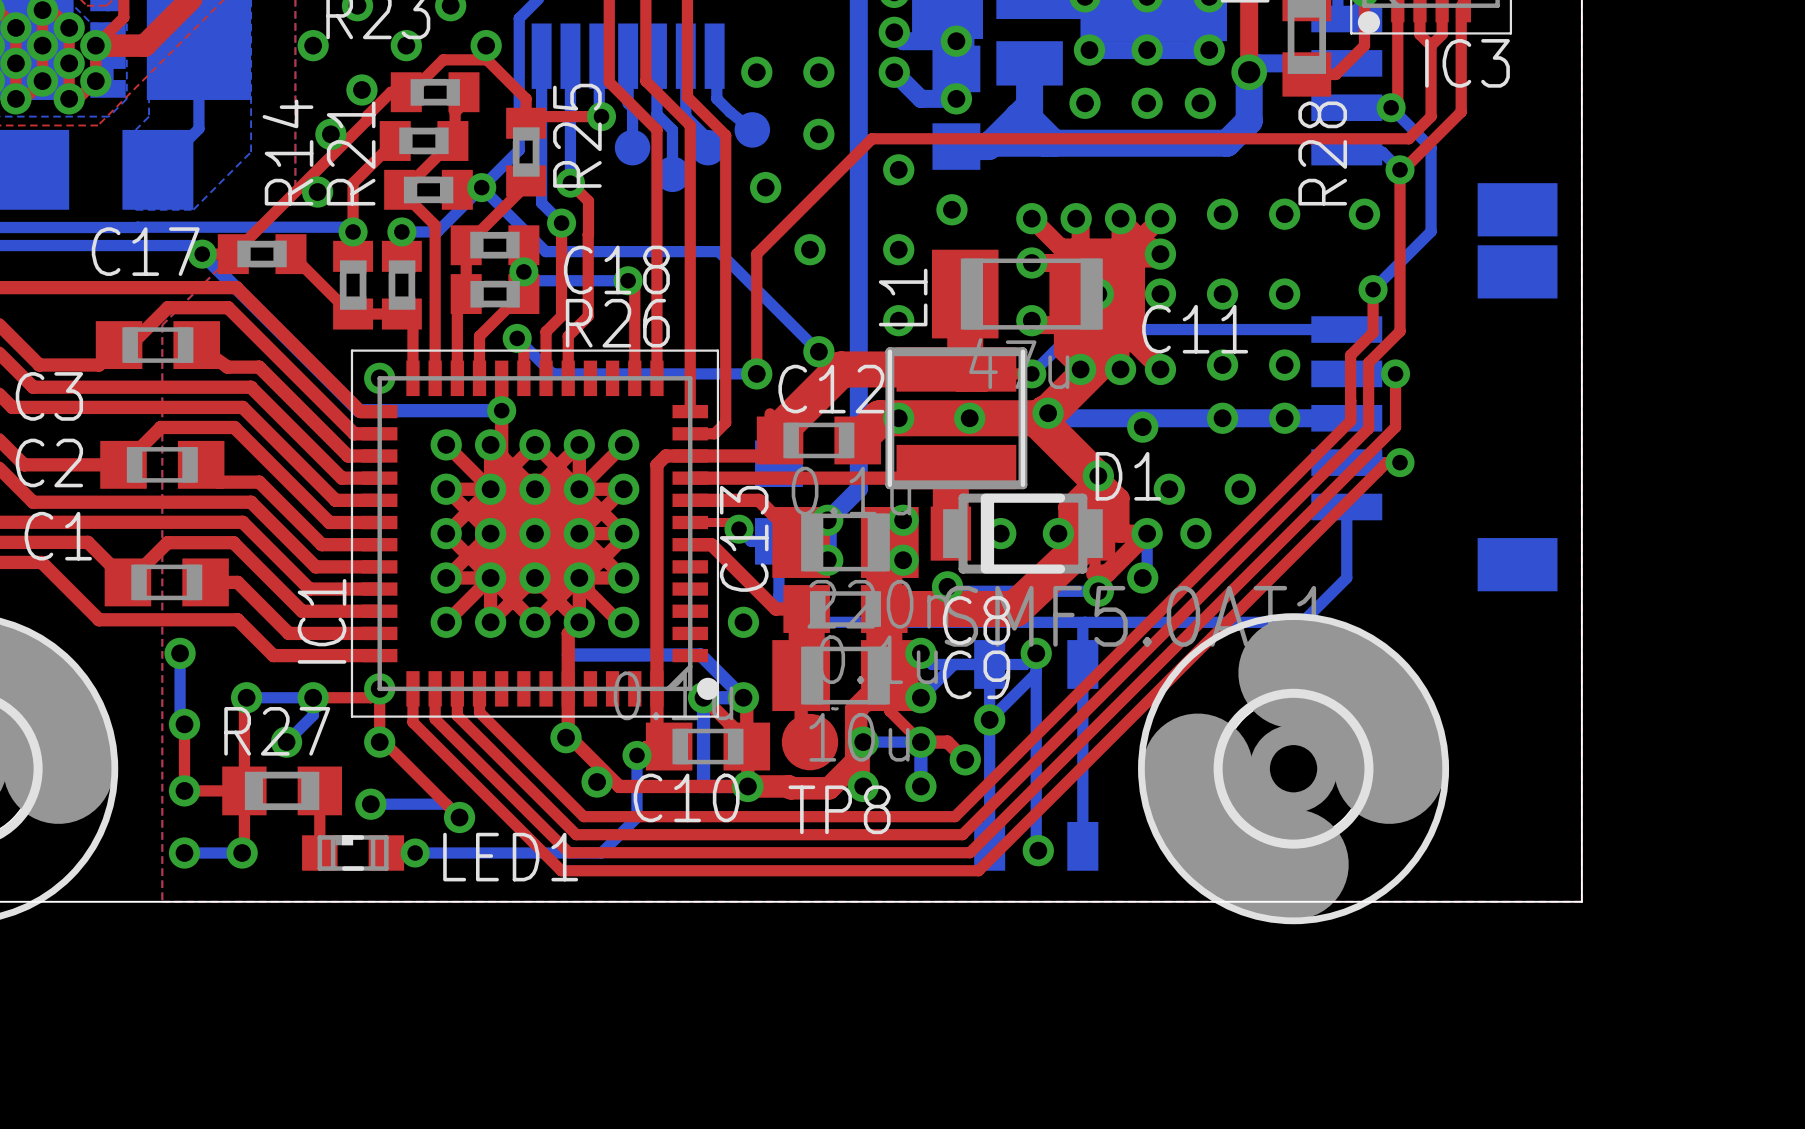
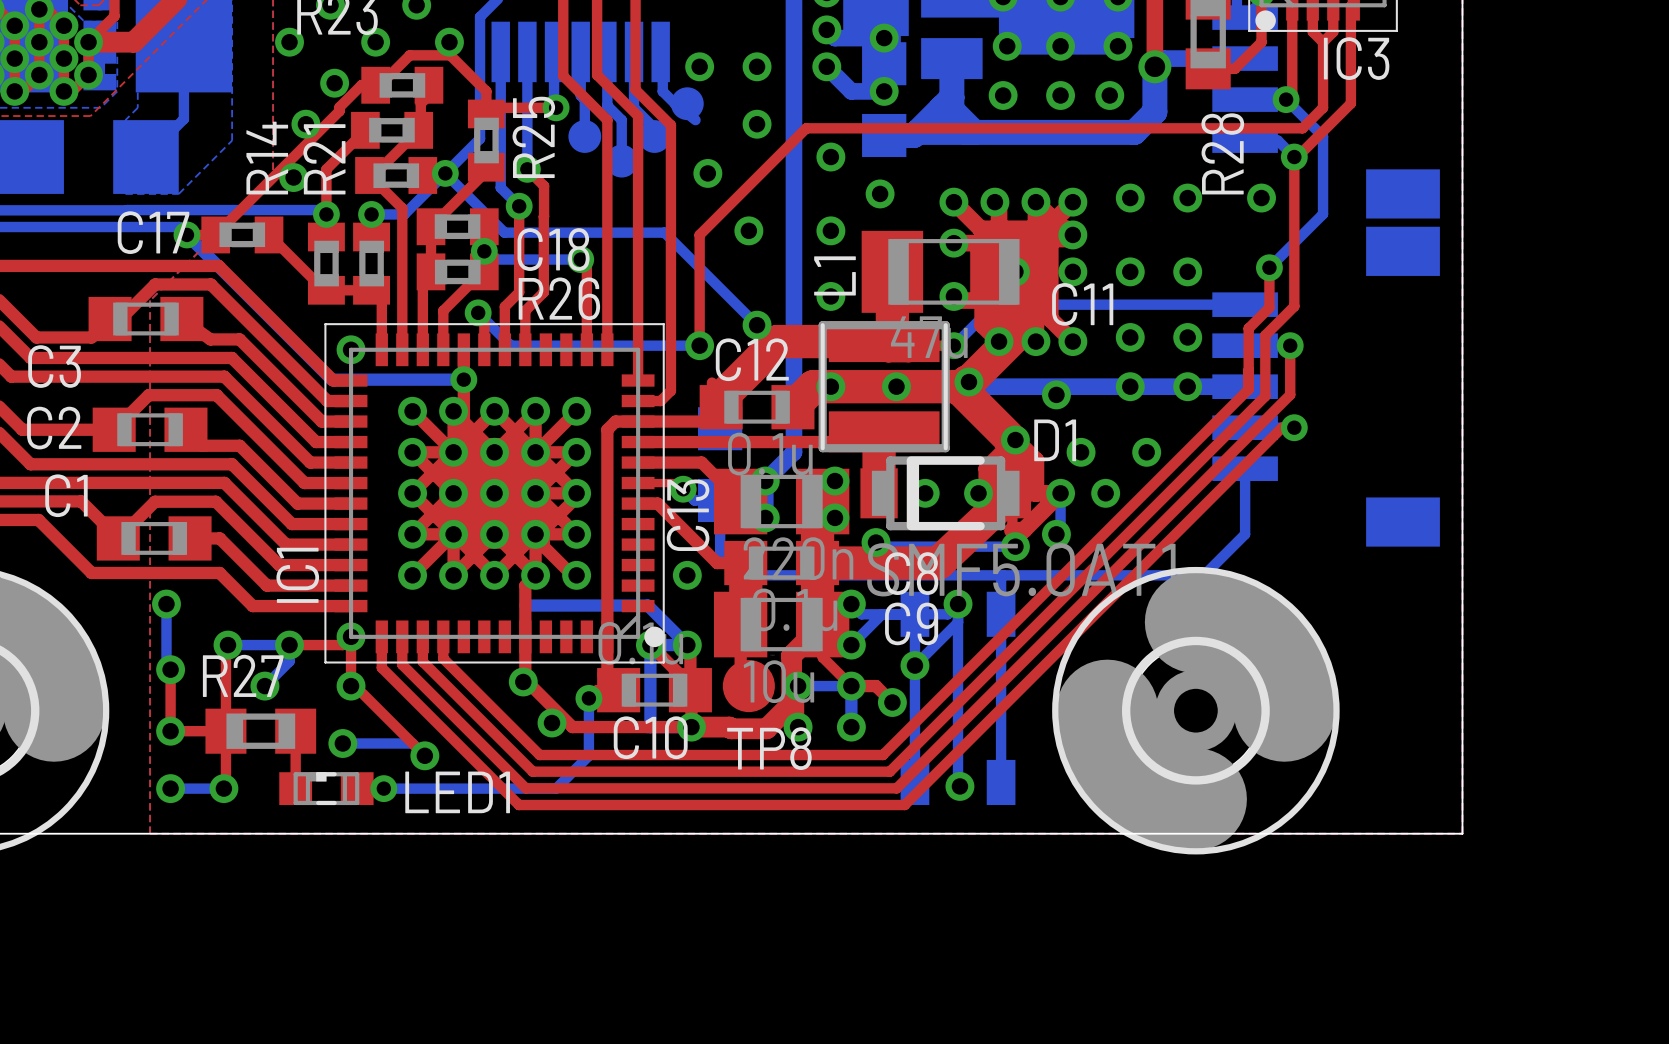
part position: (752, 129) -> (687, 103)

